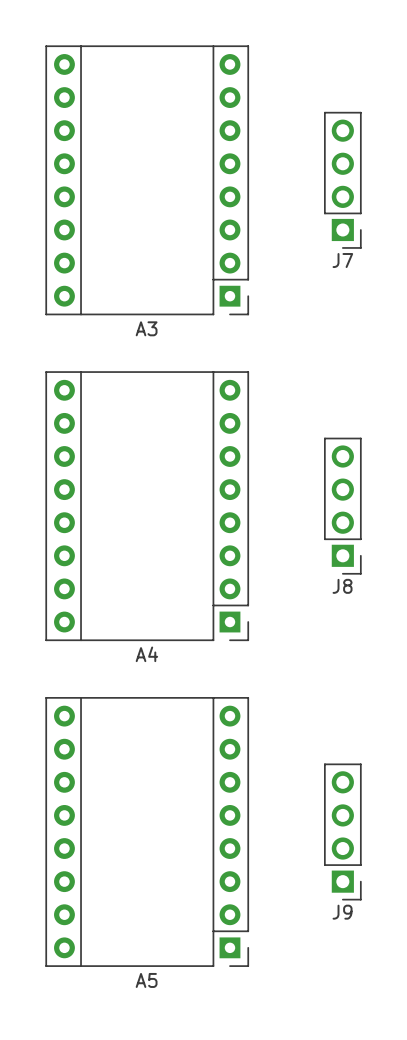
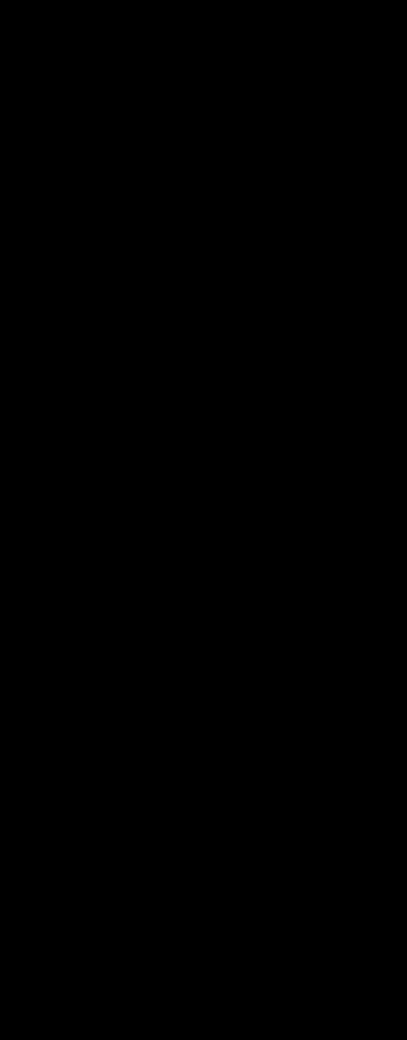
A3: (147, 180) -> none
J7: (342, 180) -> none
A4: (147, 506) -> none
J8: (342, 506) -> none
A5: (147, 831) -> none
J9: (342, 831) -> none

